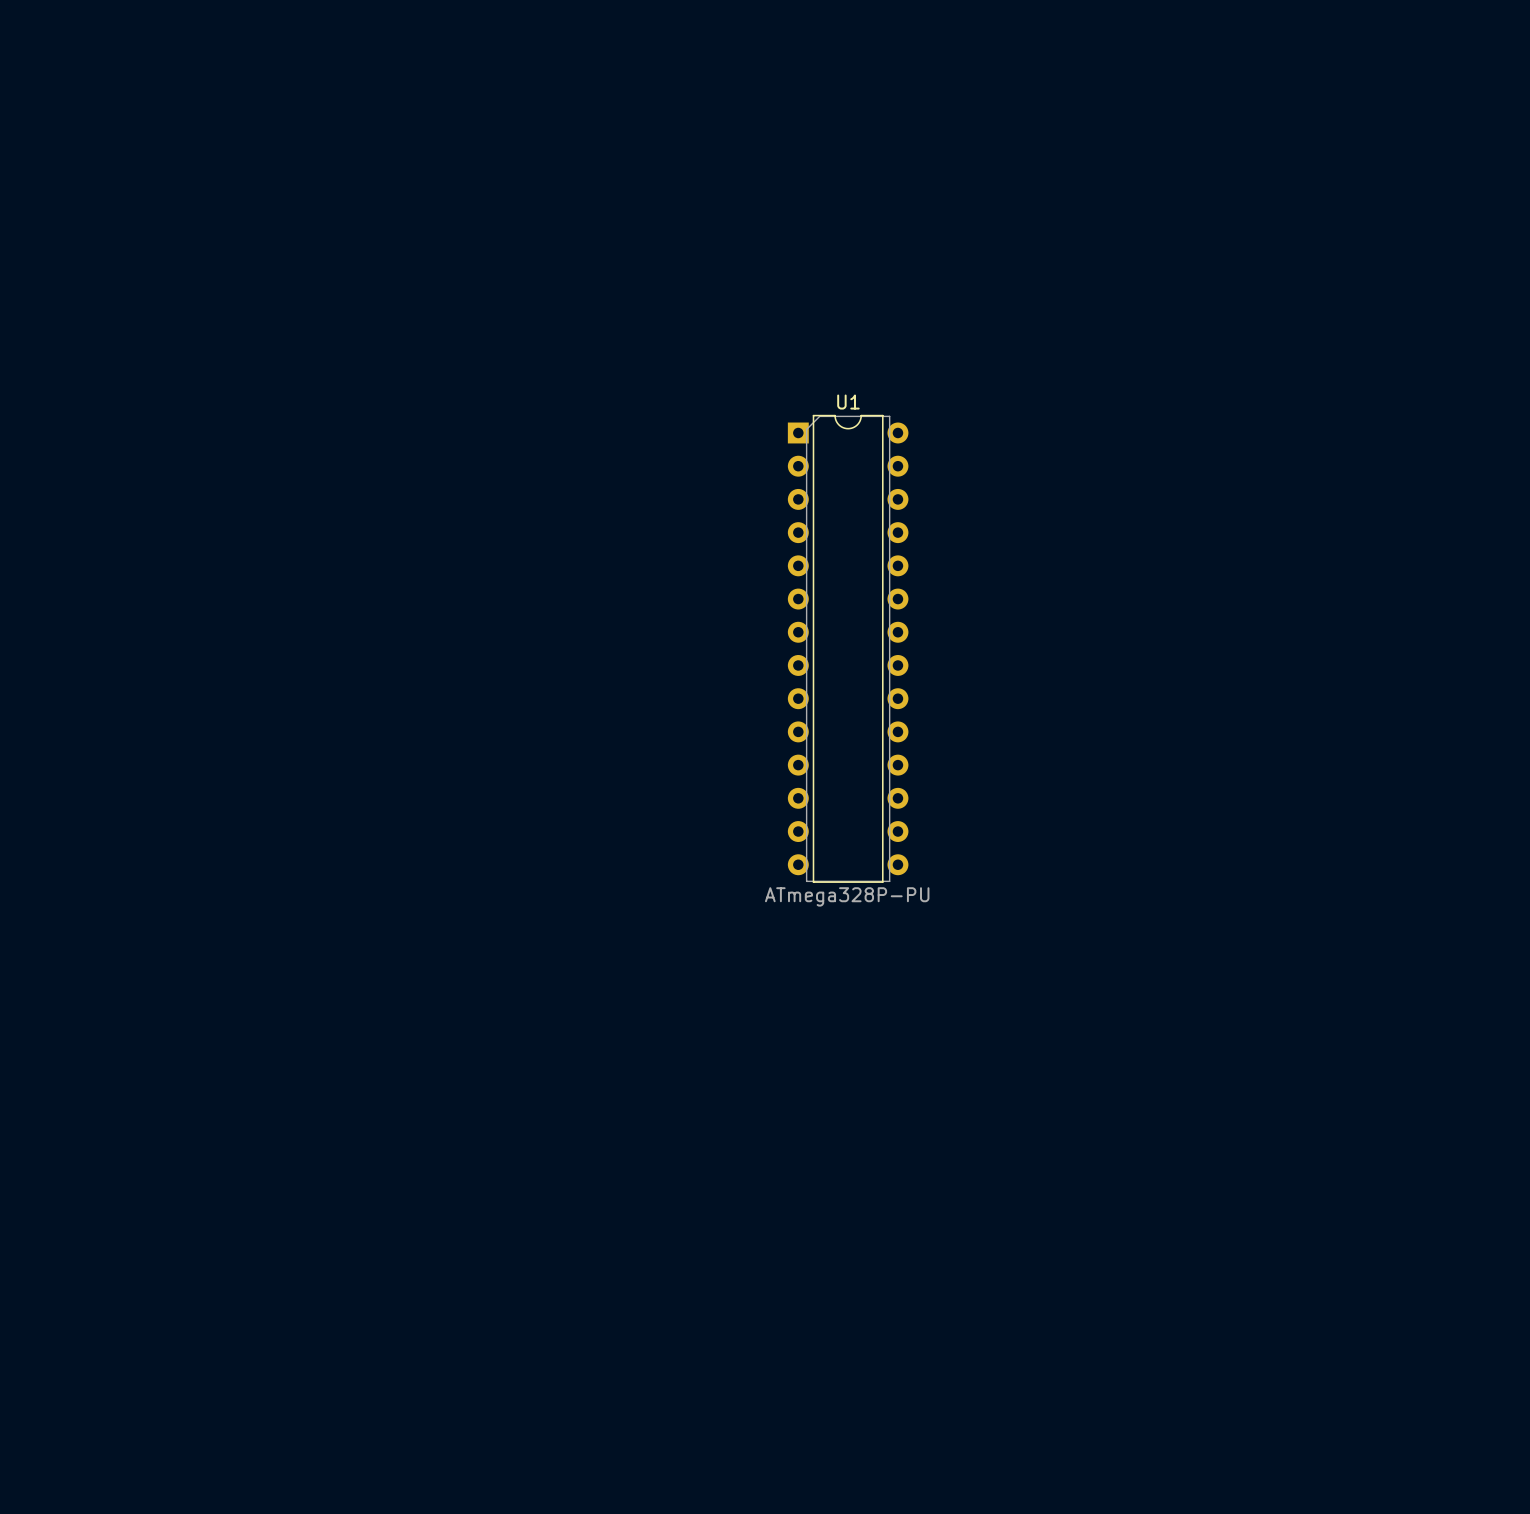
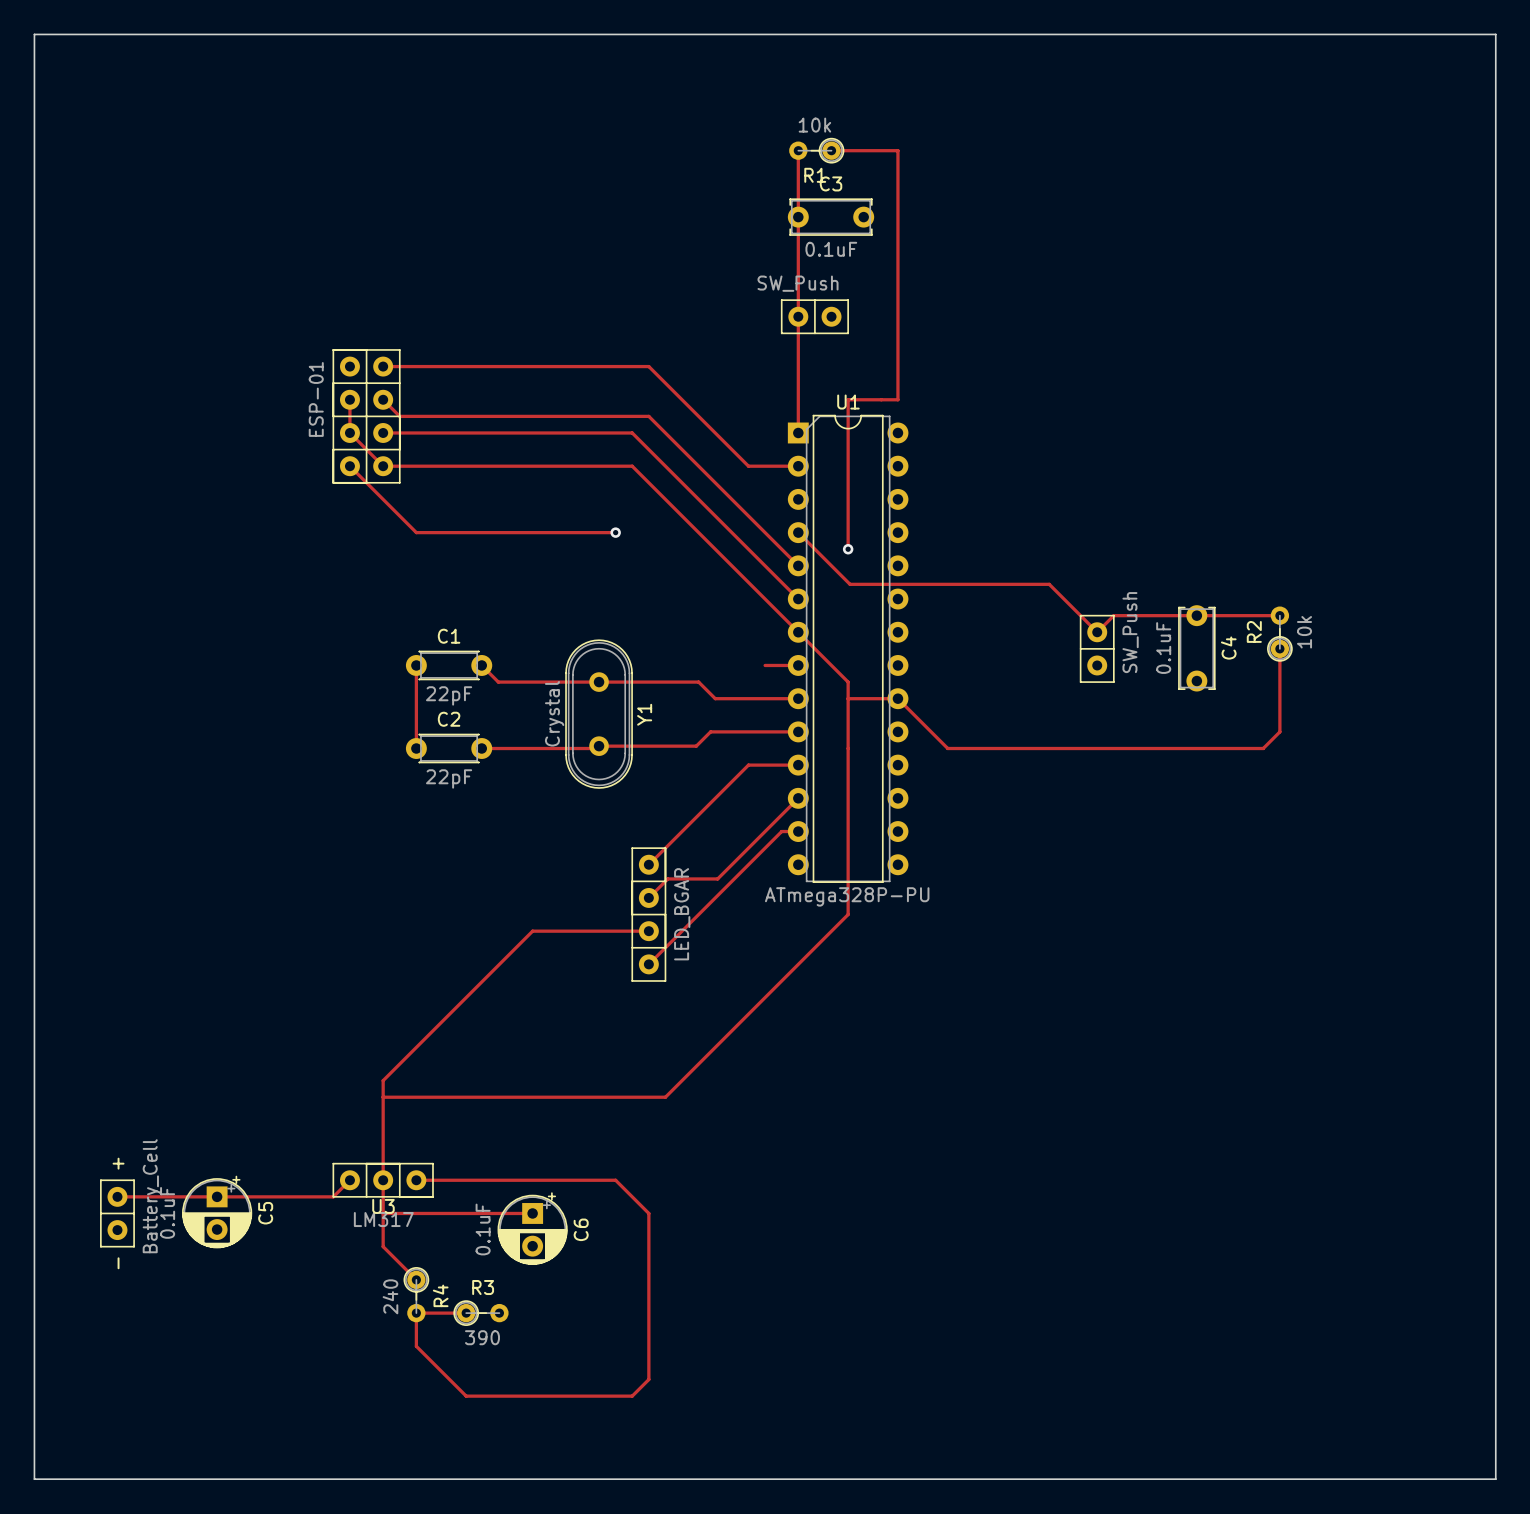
board edge: none -> (34, 34) (1495, 34) (1495, 1479) (34, 1479) (34, 34)
track: none -> (798, 150) (798, 432)
R1: none -> 10k (816, 150)
track: none -> (831, 150) (897, 150) (897, 399) (848, 399) (848, 549)
C3: none -> 0.1uF (831, 217)
part: none -> SW_Push (814, 316)
track: none -> (383, 366) (648, 366) (748, 466) (798, 466)
track: none -> (349, 399) (349, 432) (383, 466) (632, 466) (848, 682) (848, 914) (665, 1097) (383, 1097)
track: none -> (383, 399) (399, 416) (648, 416) (798, 565)
part: none -> ESP-01 (366, 416)
track: none -> (383, 432) (632, 432) (798, 599)
track: none -> (349, 466) (416, 532) (615, 532)
via: none -> (615, 532)
track: none -> (798, 532) (850, 584) (1049, 584) (1097, 632) (1113, 615) (1279, 615)
via: none -> (848, 549)
R2: none -> 10k (1279, 634)
part: none -> SW_Push (1097, 648)
C4: none -> 0.1uF (1196, 648)
track: none -> (1279, 648) (1279, 731) (1263, 748) (947, 748) (897, 698) (848, 698)
track: none -> (416, 665) (416, 748)
C1: none -> 22pF (449, 665)
track: none -> (481, 665) (498, 682) (698, 682) (715, 698) (798, 698)
track: none -> (765, 665) (798, 665)
Y1: none -> Crystal (599, 714)
track: none -> (798, 731) (710, 731) (696, 746) (481, 748)
C2: none -> 22pF (449, 748)
track: none -> (798, 765) (748, 765) (648, 864)
track: none -> (798, 798) (717, 878) (667, 878) (648, 897)
track: none -> (798, 831) (781, 831) (648, 964)
part: none -> LED_BGAR (648, 914)
track: none -> (648, 931) (532, 931) (383, 1080) (383, 1246) (416, 1279)
track: none -> (349, 1180) (333, 1196) (117, 1196)
U3: none -> LM317 (383, 1180)
track: none -> (416, 1180) (615, 1180) (648, 1213) (648, 1379) (632, 1396) (466, 1396) (416, 1346) (416, 1313) (466, 1313)
C5: none -> 0.1uF (217, 1212)
part: none -> Battery_Cell (117, 1213)
track: none -> (383, 1213) (532, 1213)
C6: none -> 0.1uF (532, 1228)
R4: none -> 240 (416, 1294)
R3: none -> 390 (480, 1313)

